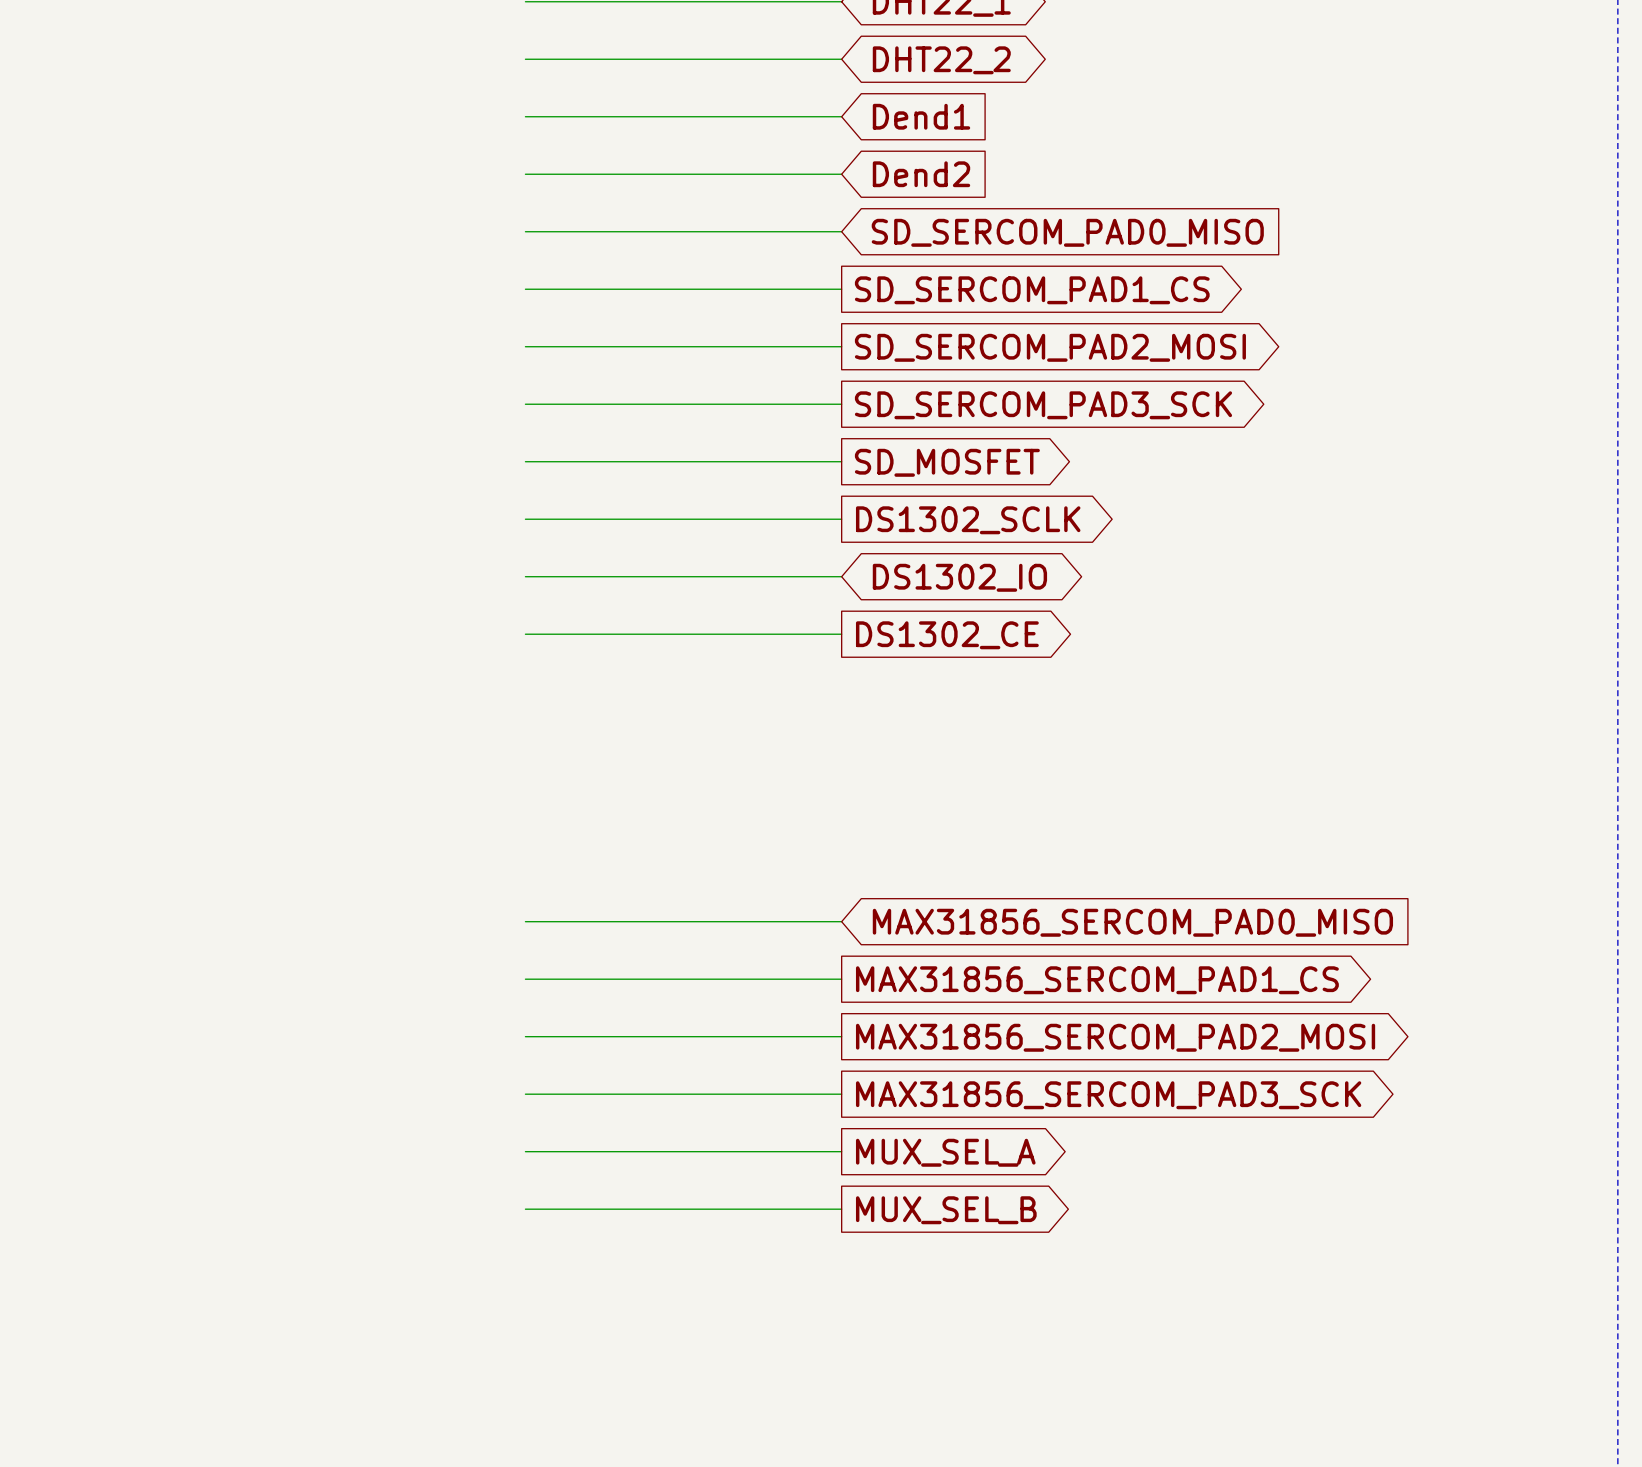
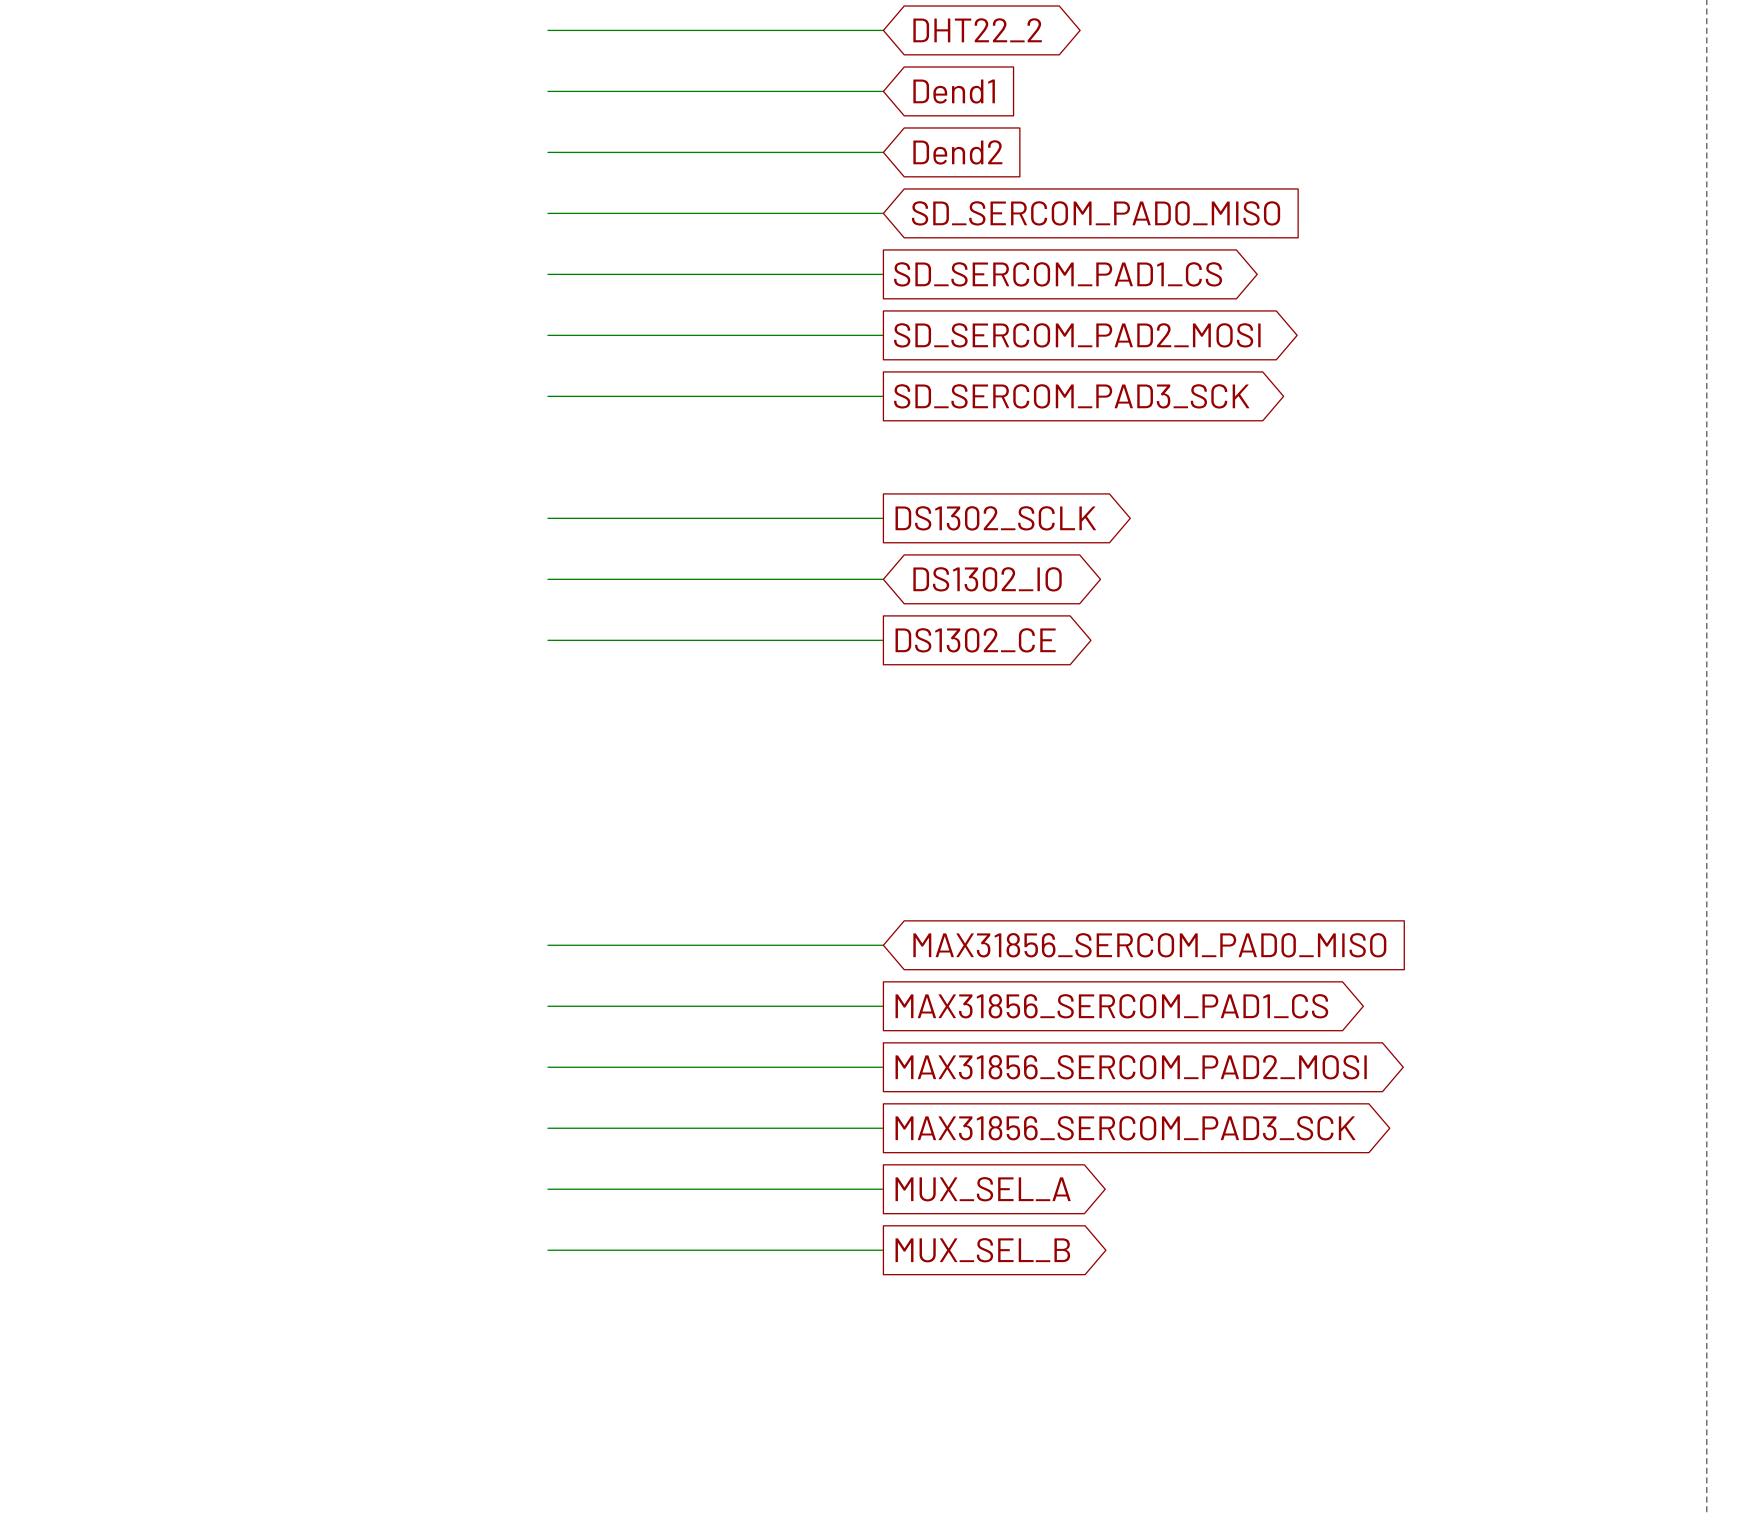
wire: (525, 461) (841, 461) -> none
global label: SD_MOSFET (947, 462) -> none

